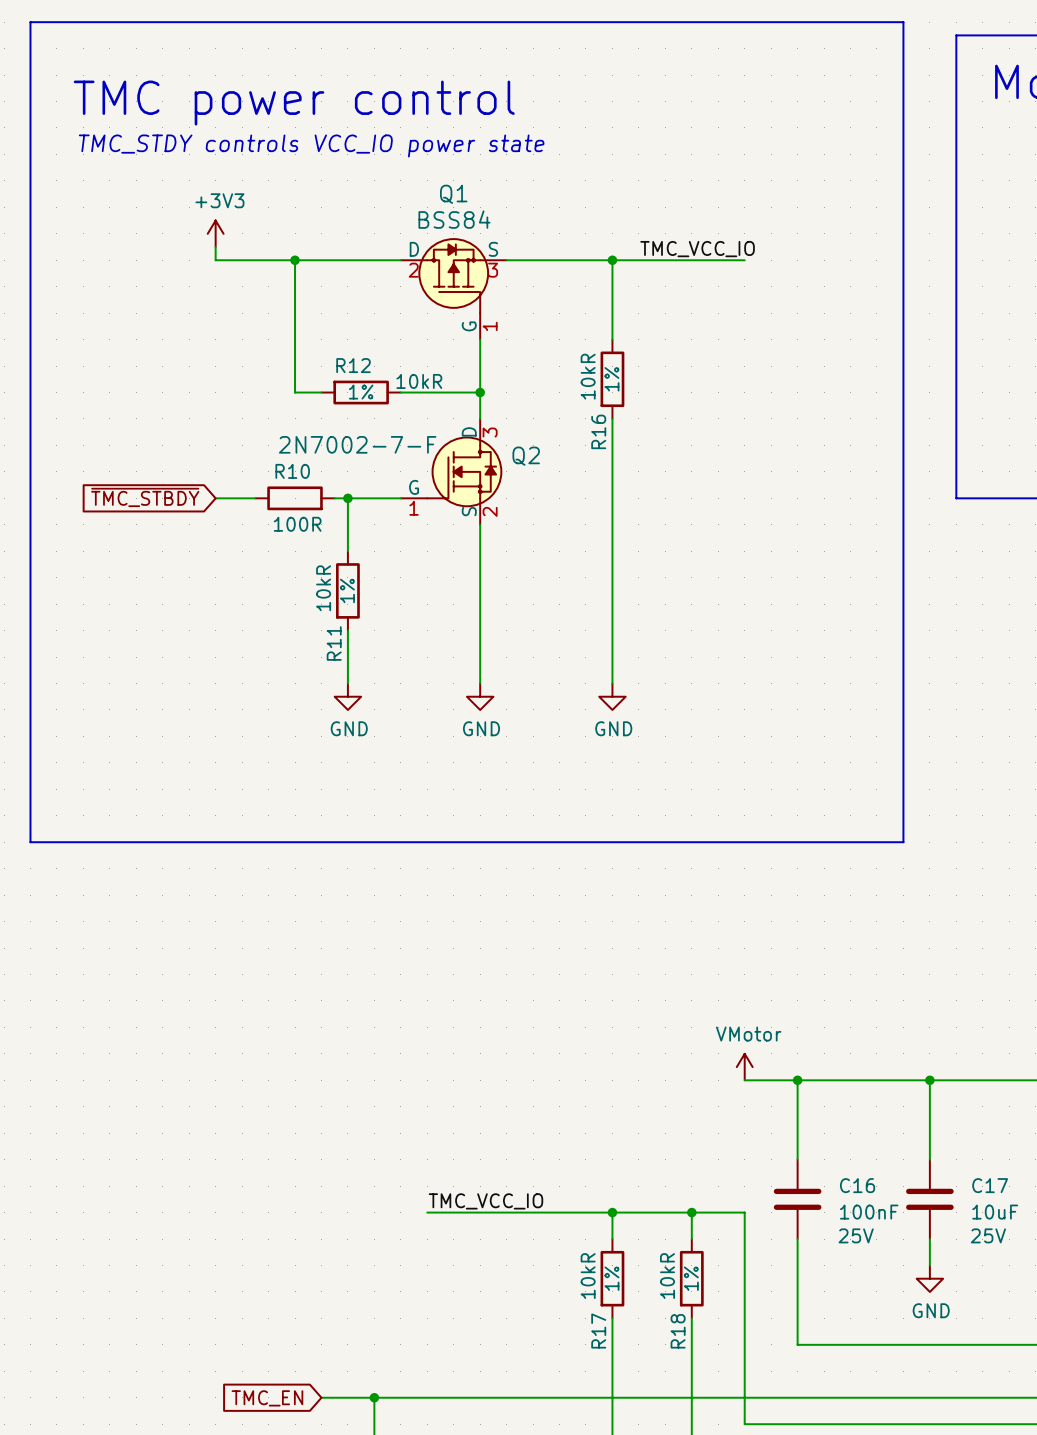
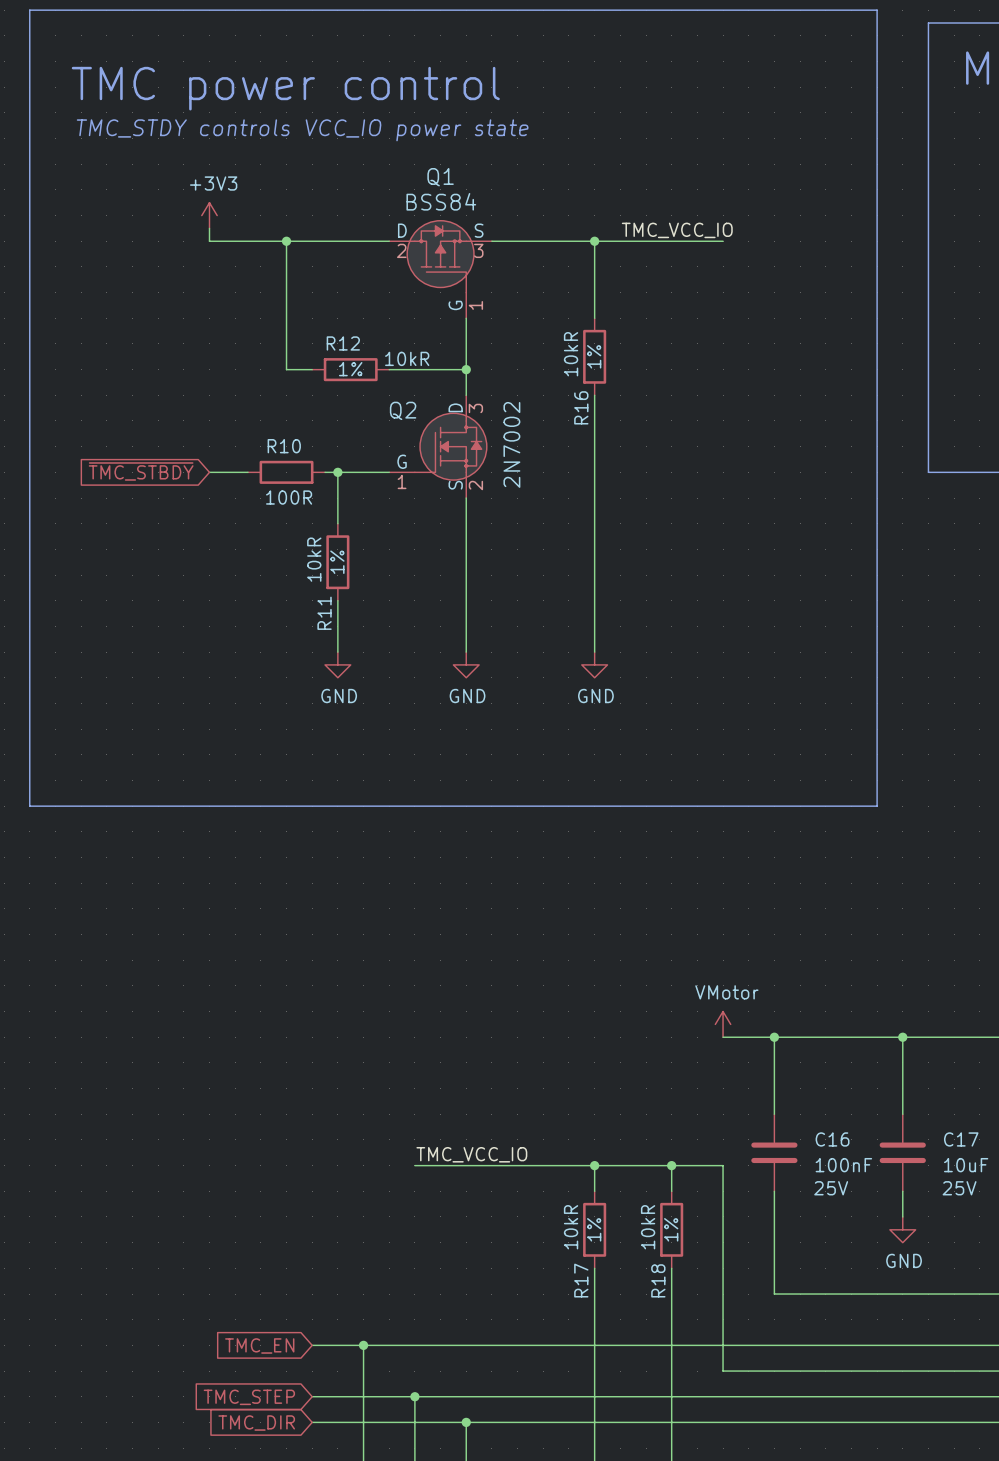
Q2 value: 2N7002-7-F (357, 444) -> 2N7002 (511, 444)
Q2 name position: Q2 (526, 456) -> Q2 (403, 410)

